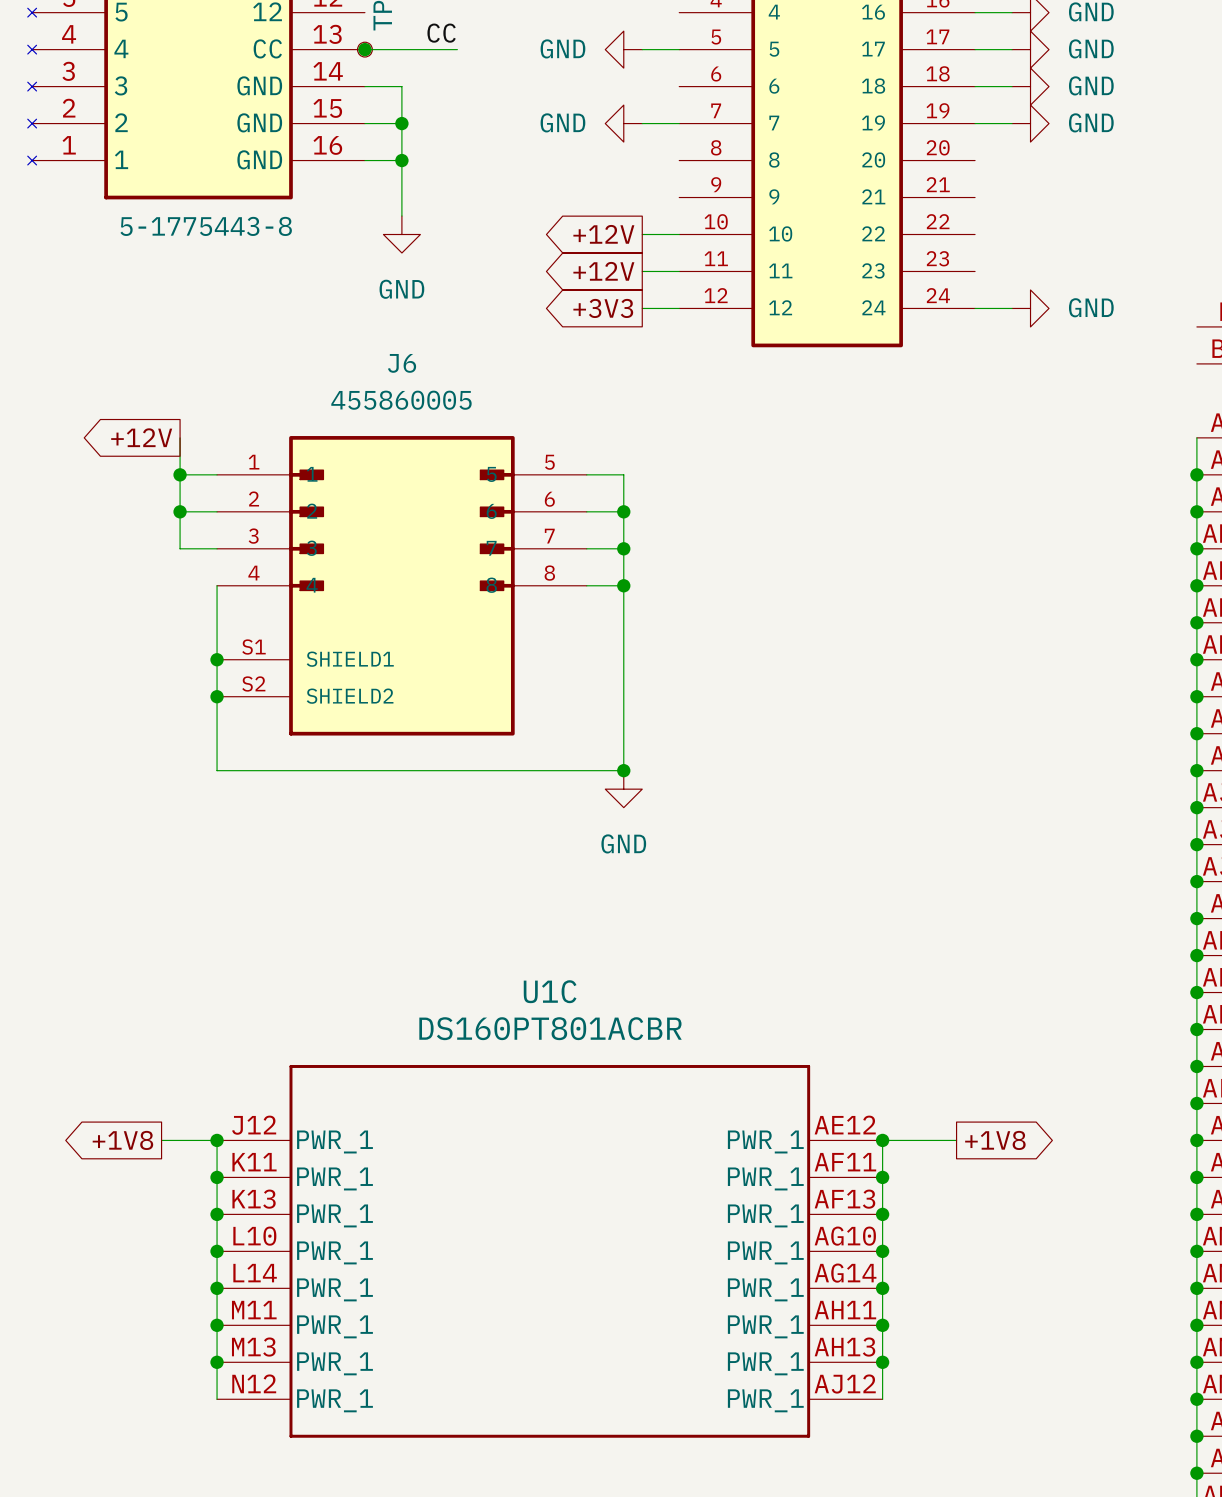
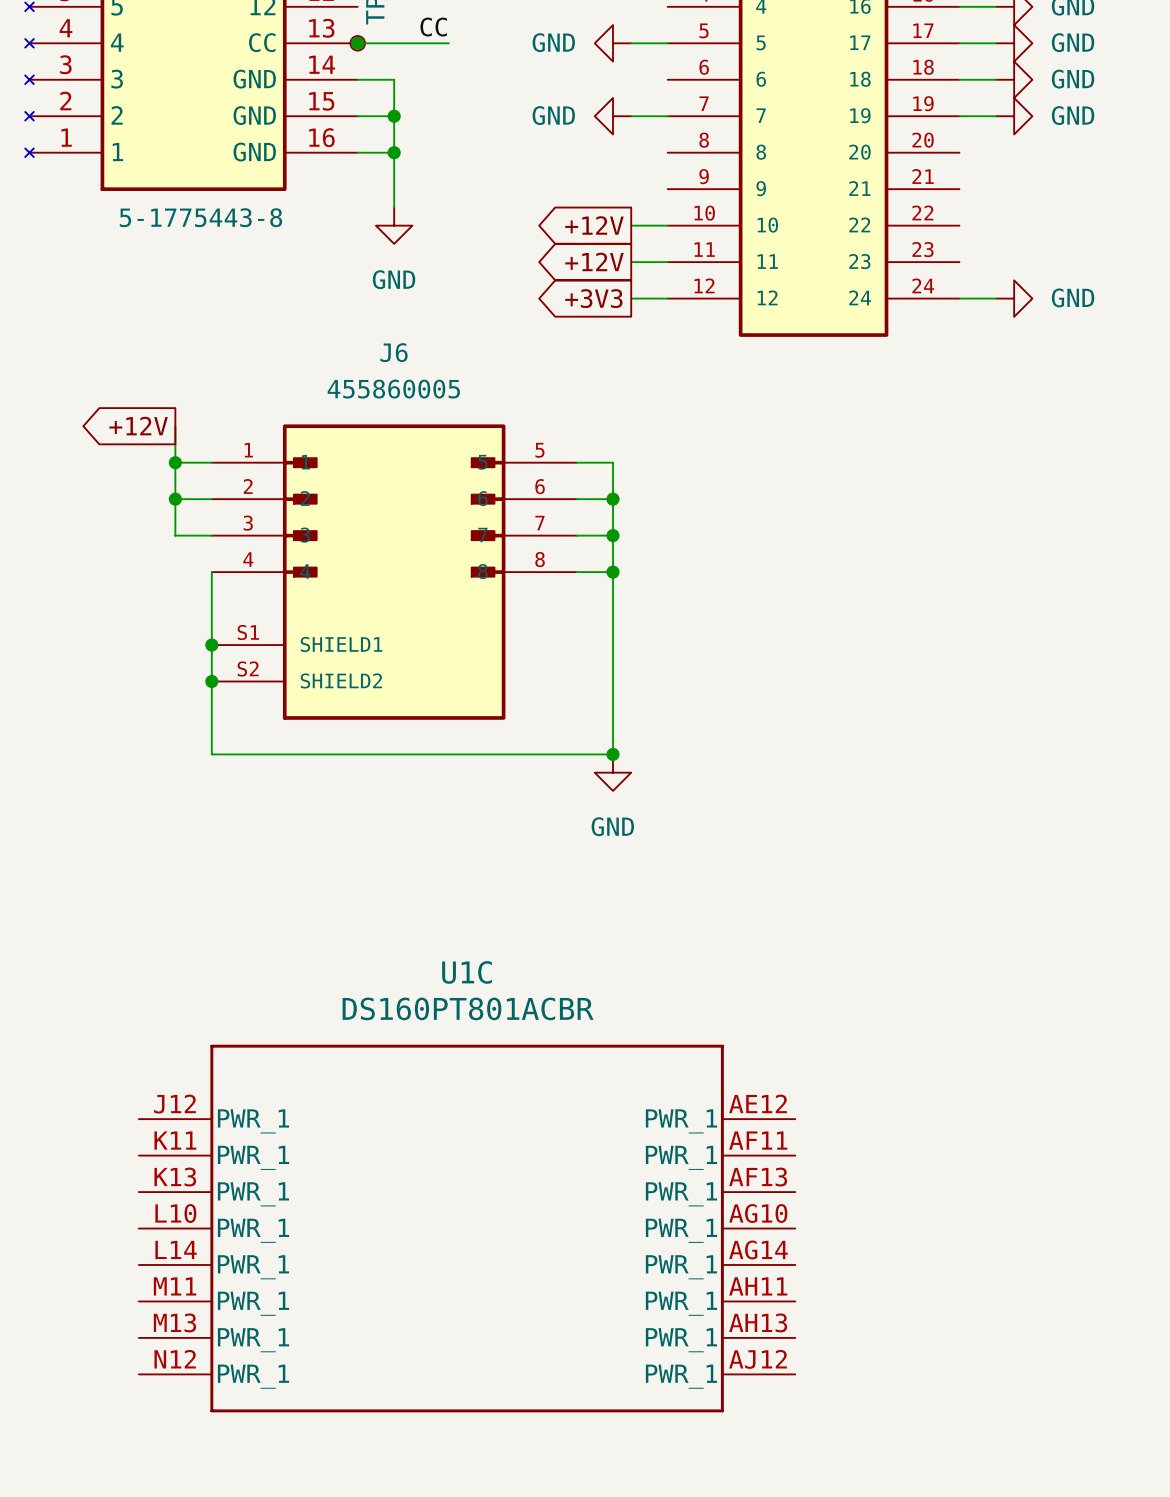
global label: +1V8 (122, 1140) -> none
junction: (217, 1140) -> none
junction: (882, 1140) -> none
wire: (956, 1140) (882, 1140) (882, 1399) -> none
global label: +1V8 (995, 1140) -> none
junction: (217, 1177) -> none
junction: (882, 1177) -> none
junction: (217, 1214) -> none
junction: (882, 1214) -> none
junction: (217, 1251) -> none
U1C position: (549, 1251) -> (467, 1228)
junction: (882, 1251) -> none
junction: (217, 1288) -> none
junction: (882, 1288) -> none
junction: (217, 1325) -> none
junction: (882, 1325) -> none
junction: (217, 1362) -> none
junction: (882, 1362) -> none

